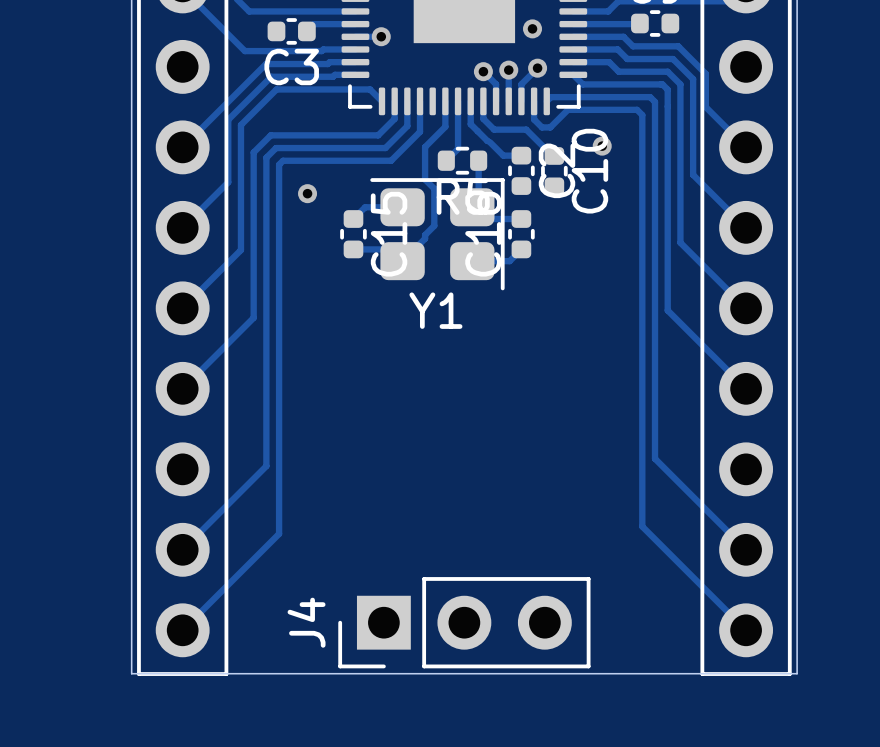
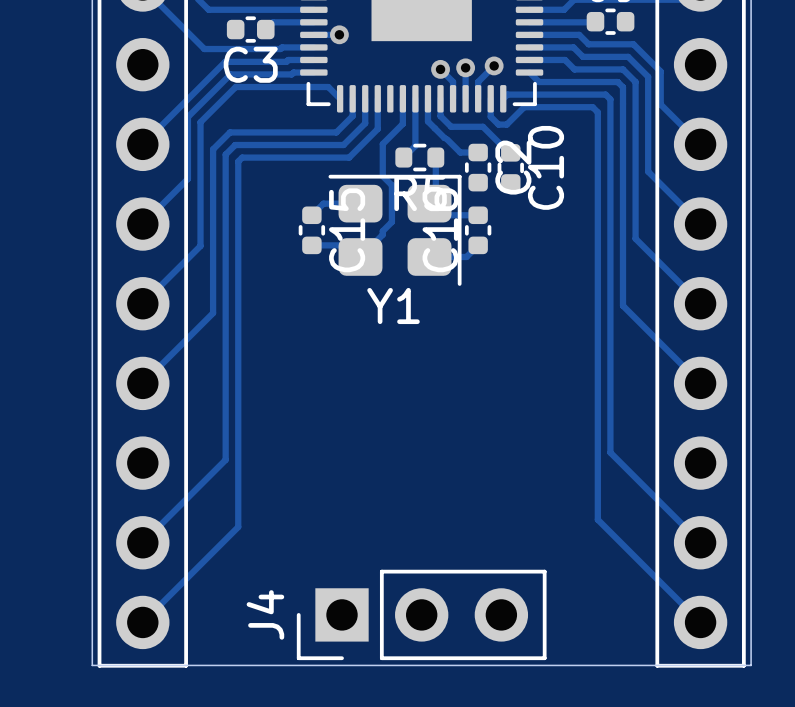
via: (532, 28) -> none
via: (602, 146) -> none
via: (307, 193) -> none

